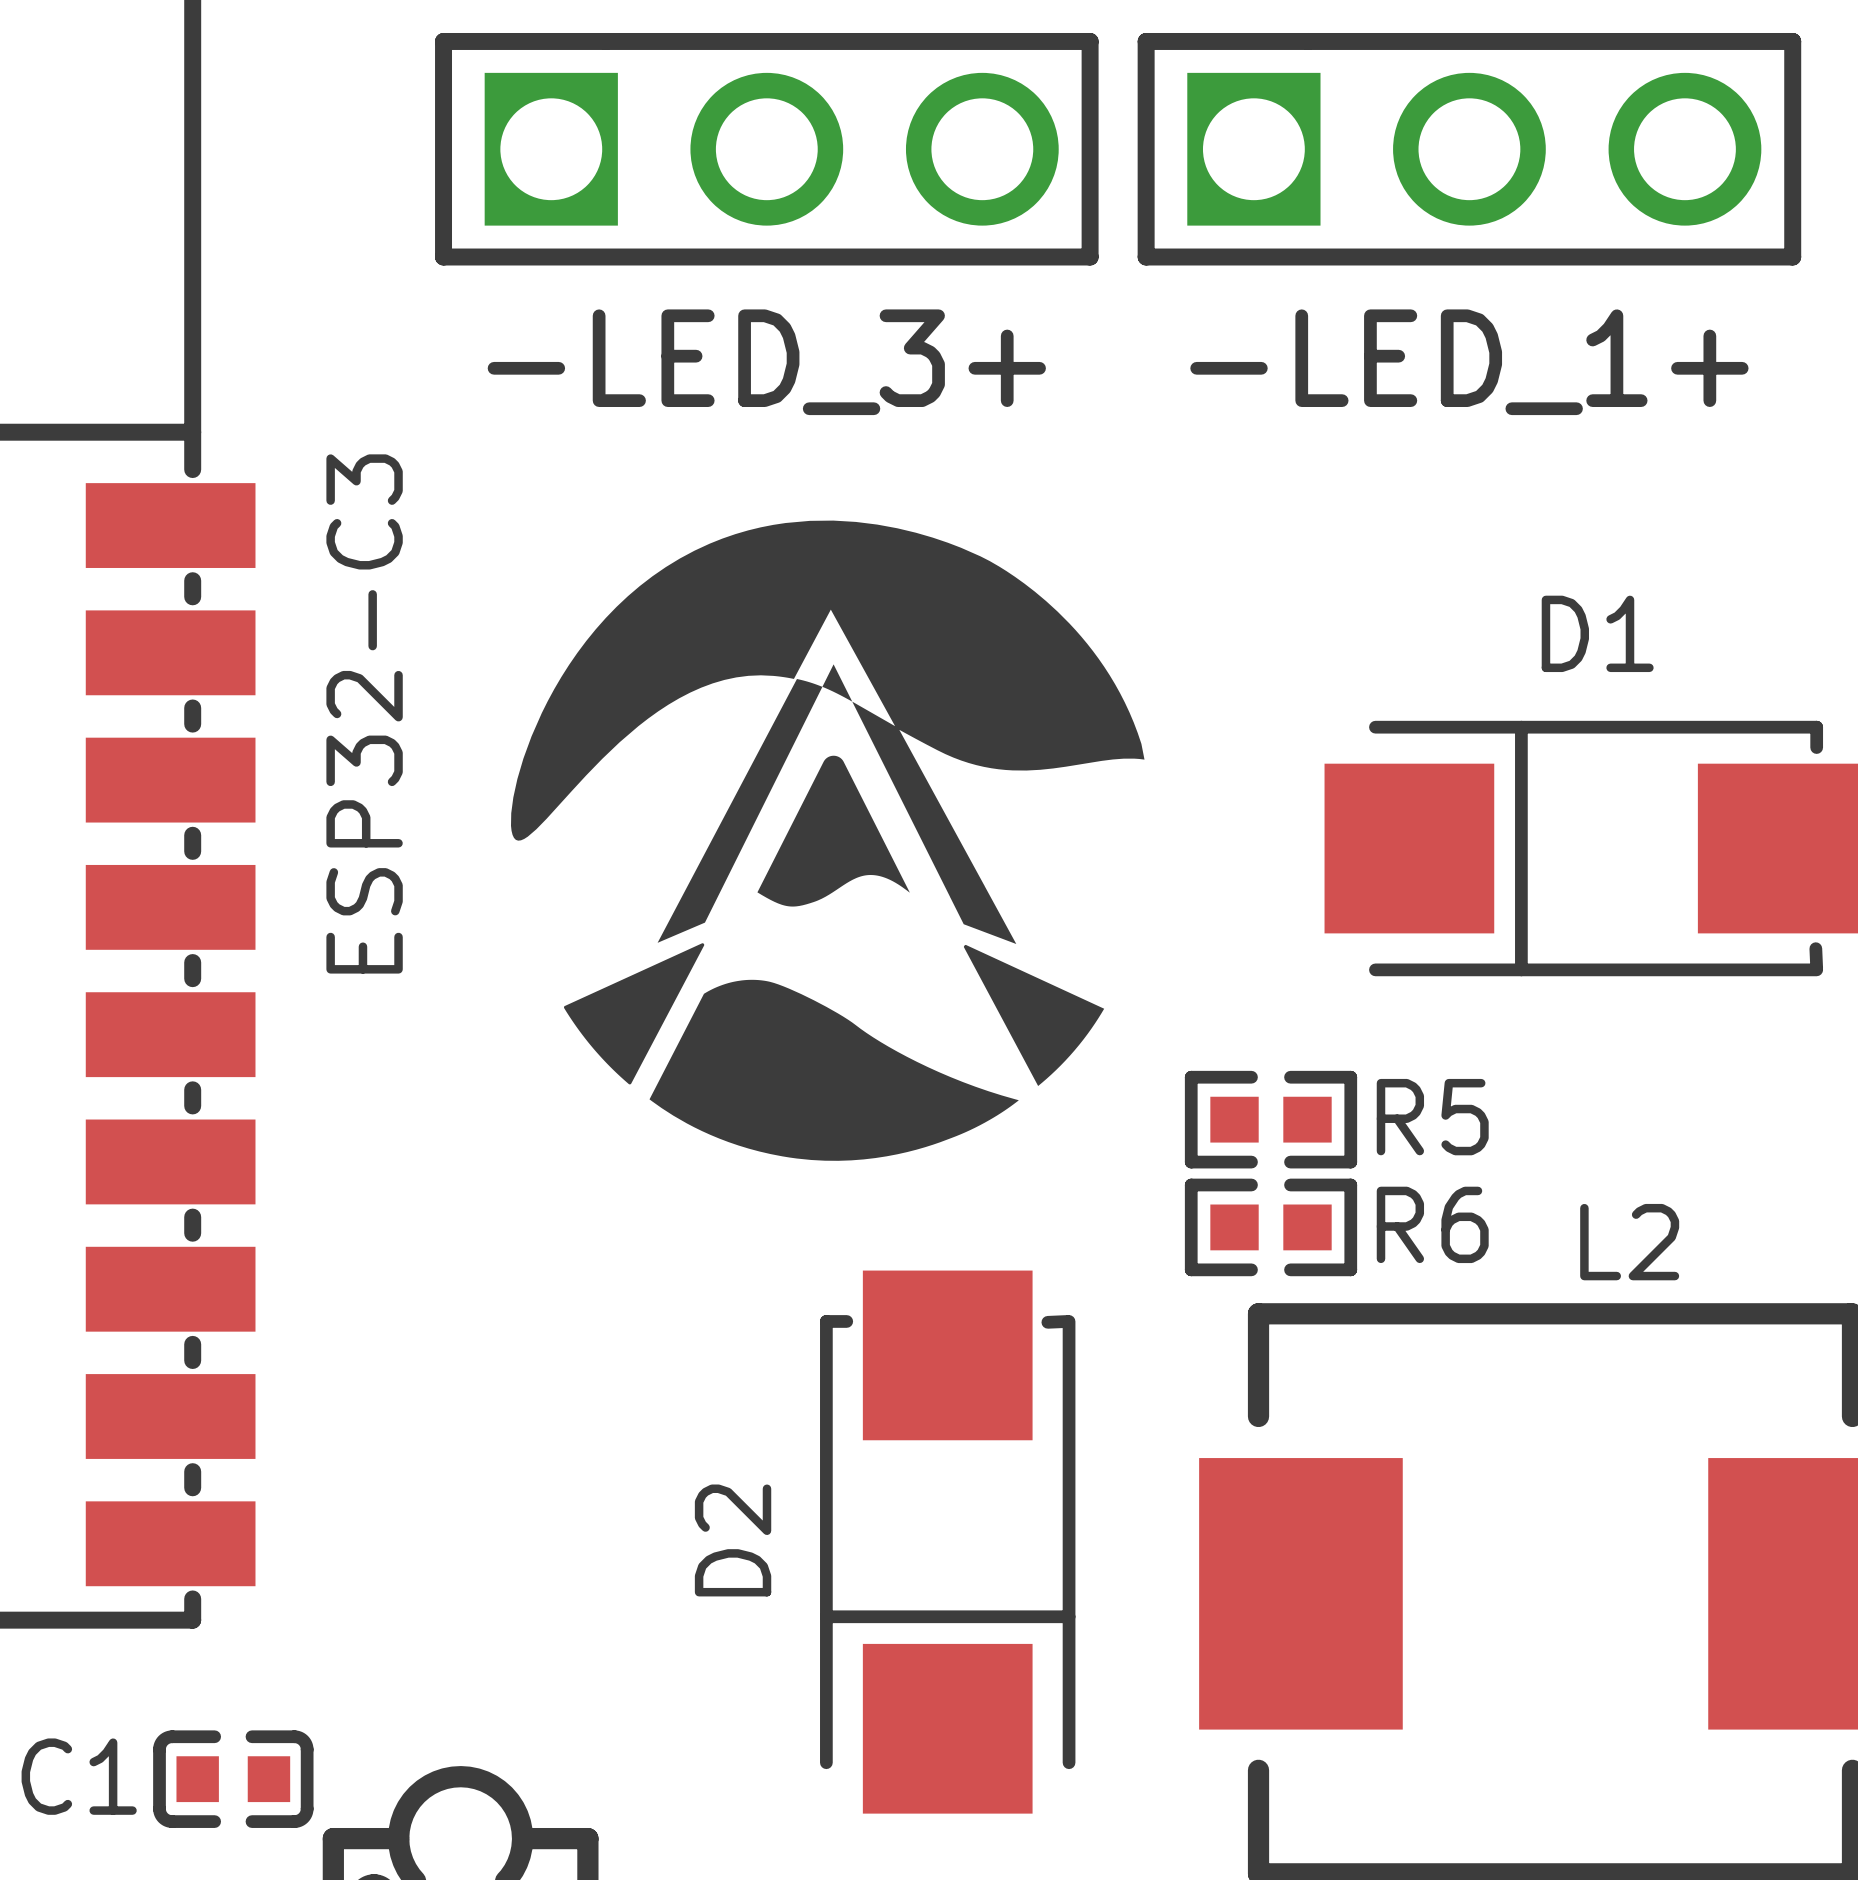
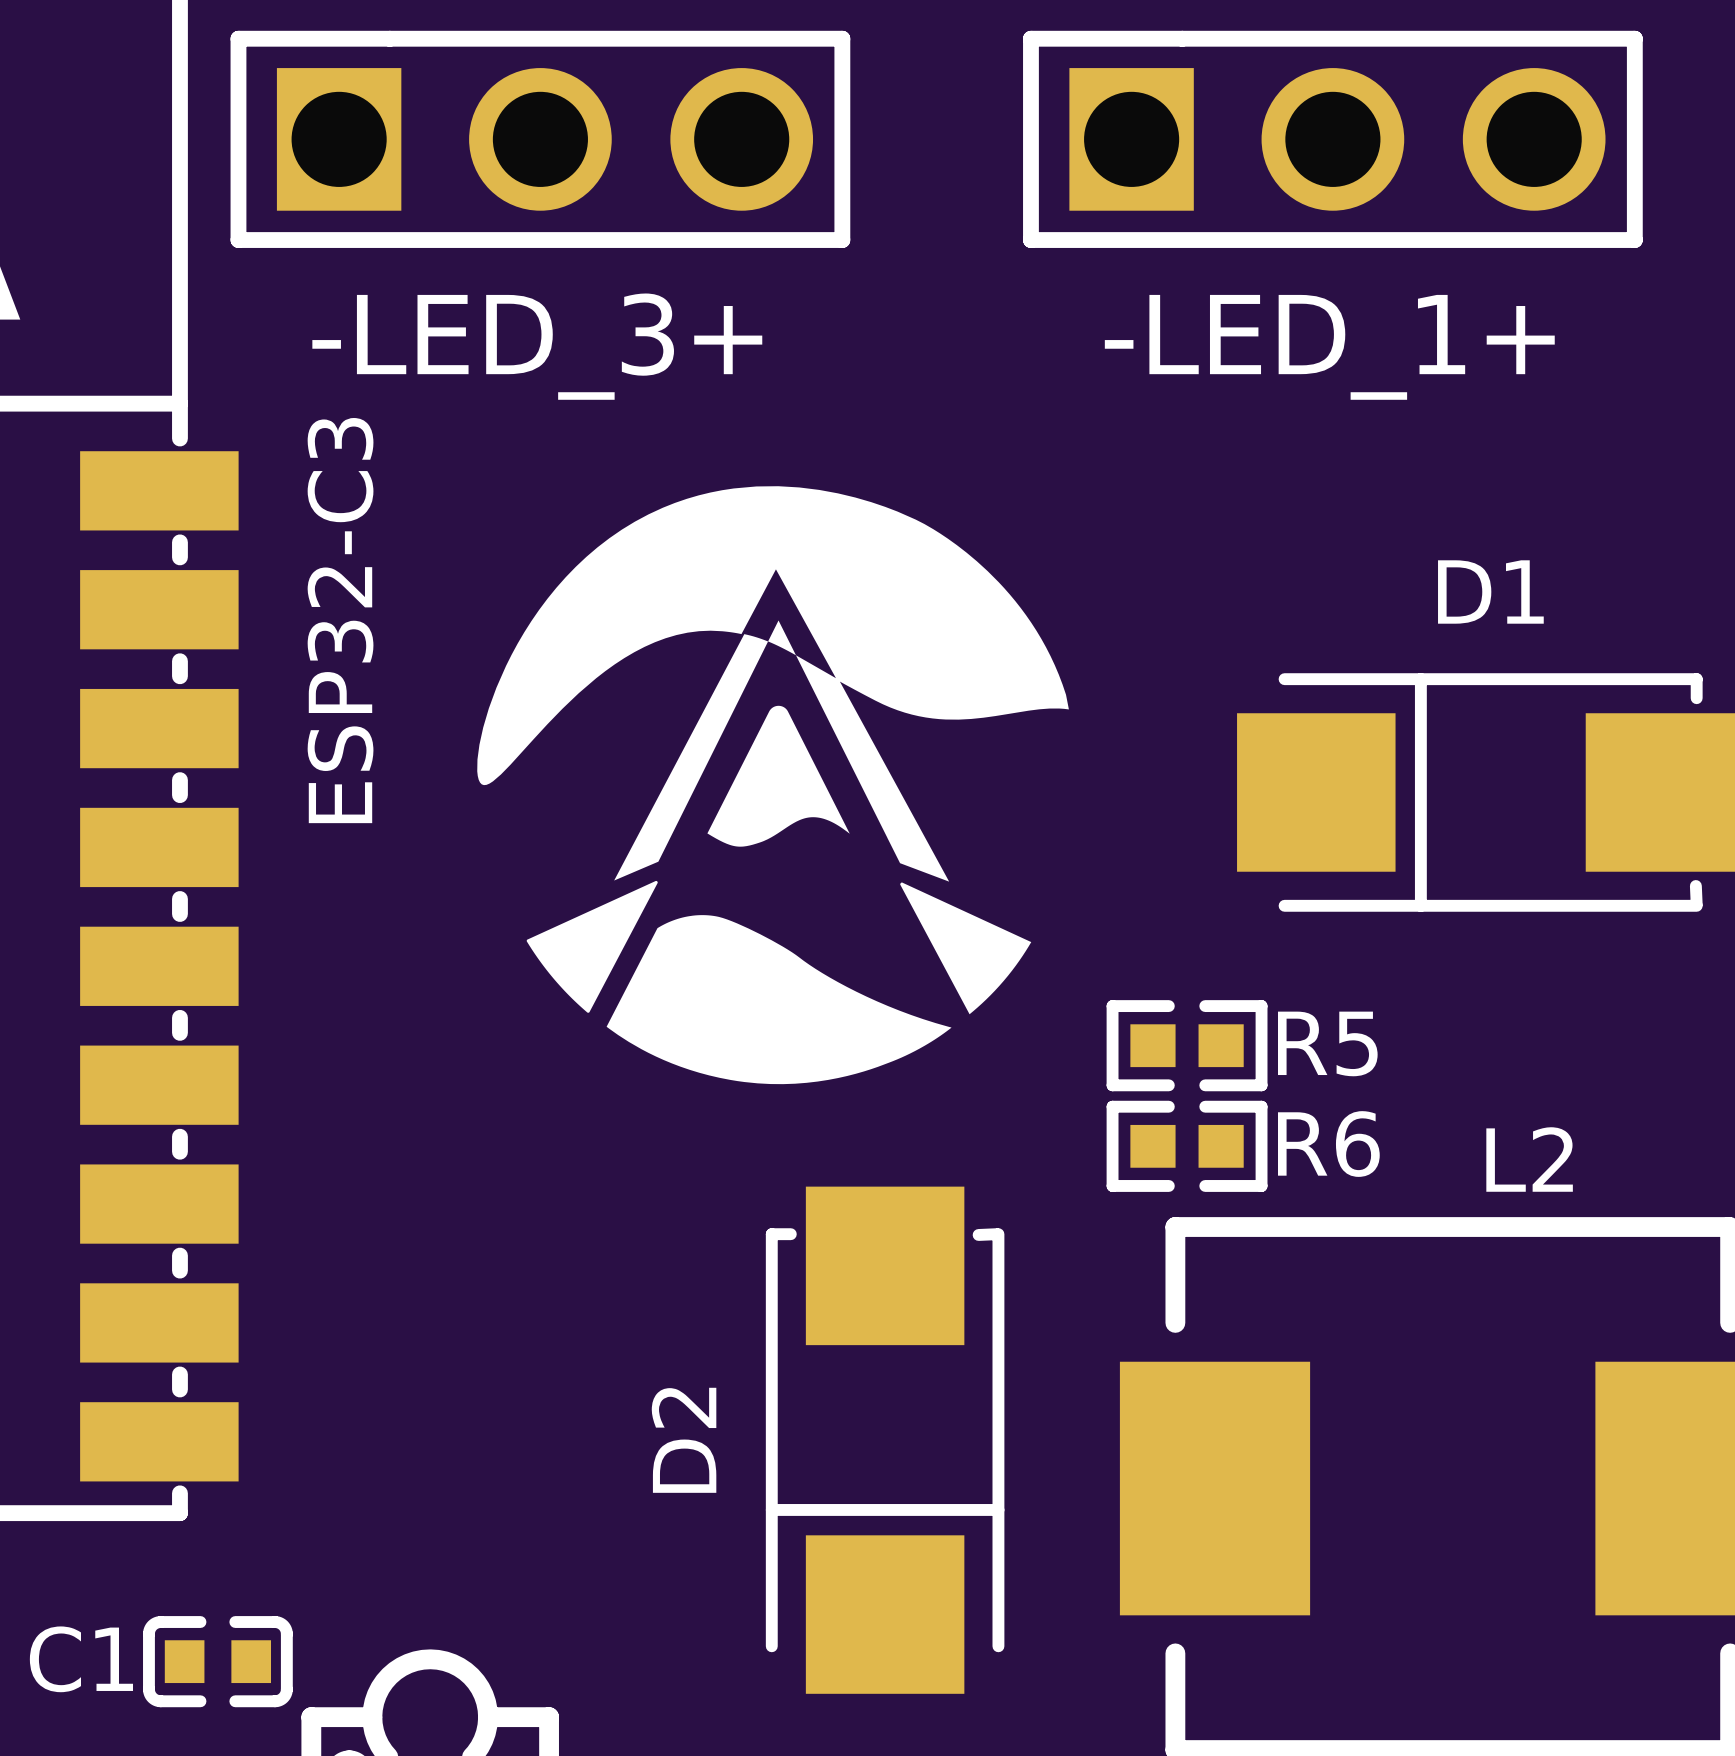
-LED_3+ position: (766, 149) -> (540, 139)
-LED_1+ position: (1469, 149) -> (1332, 139)

